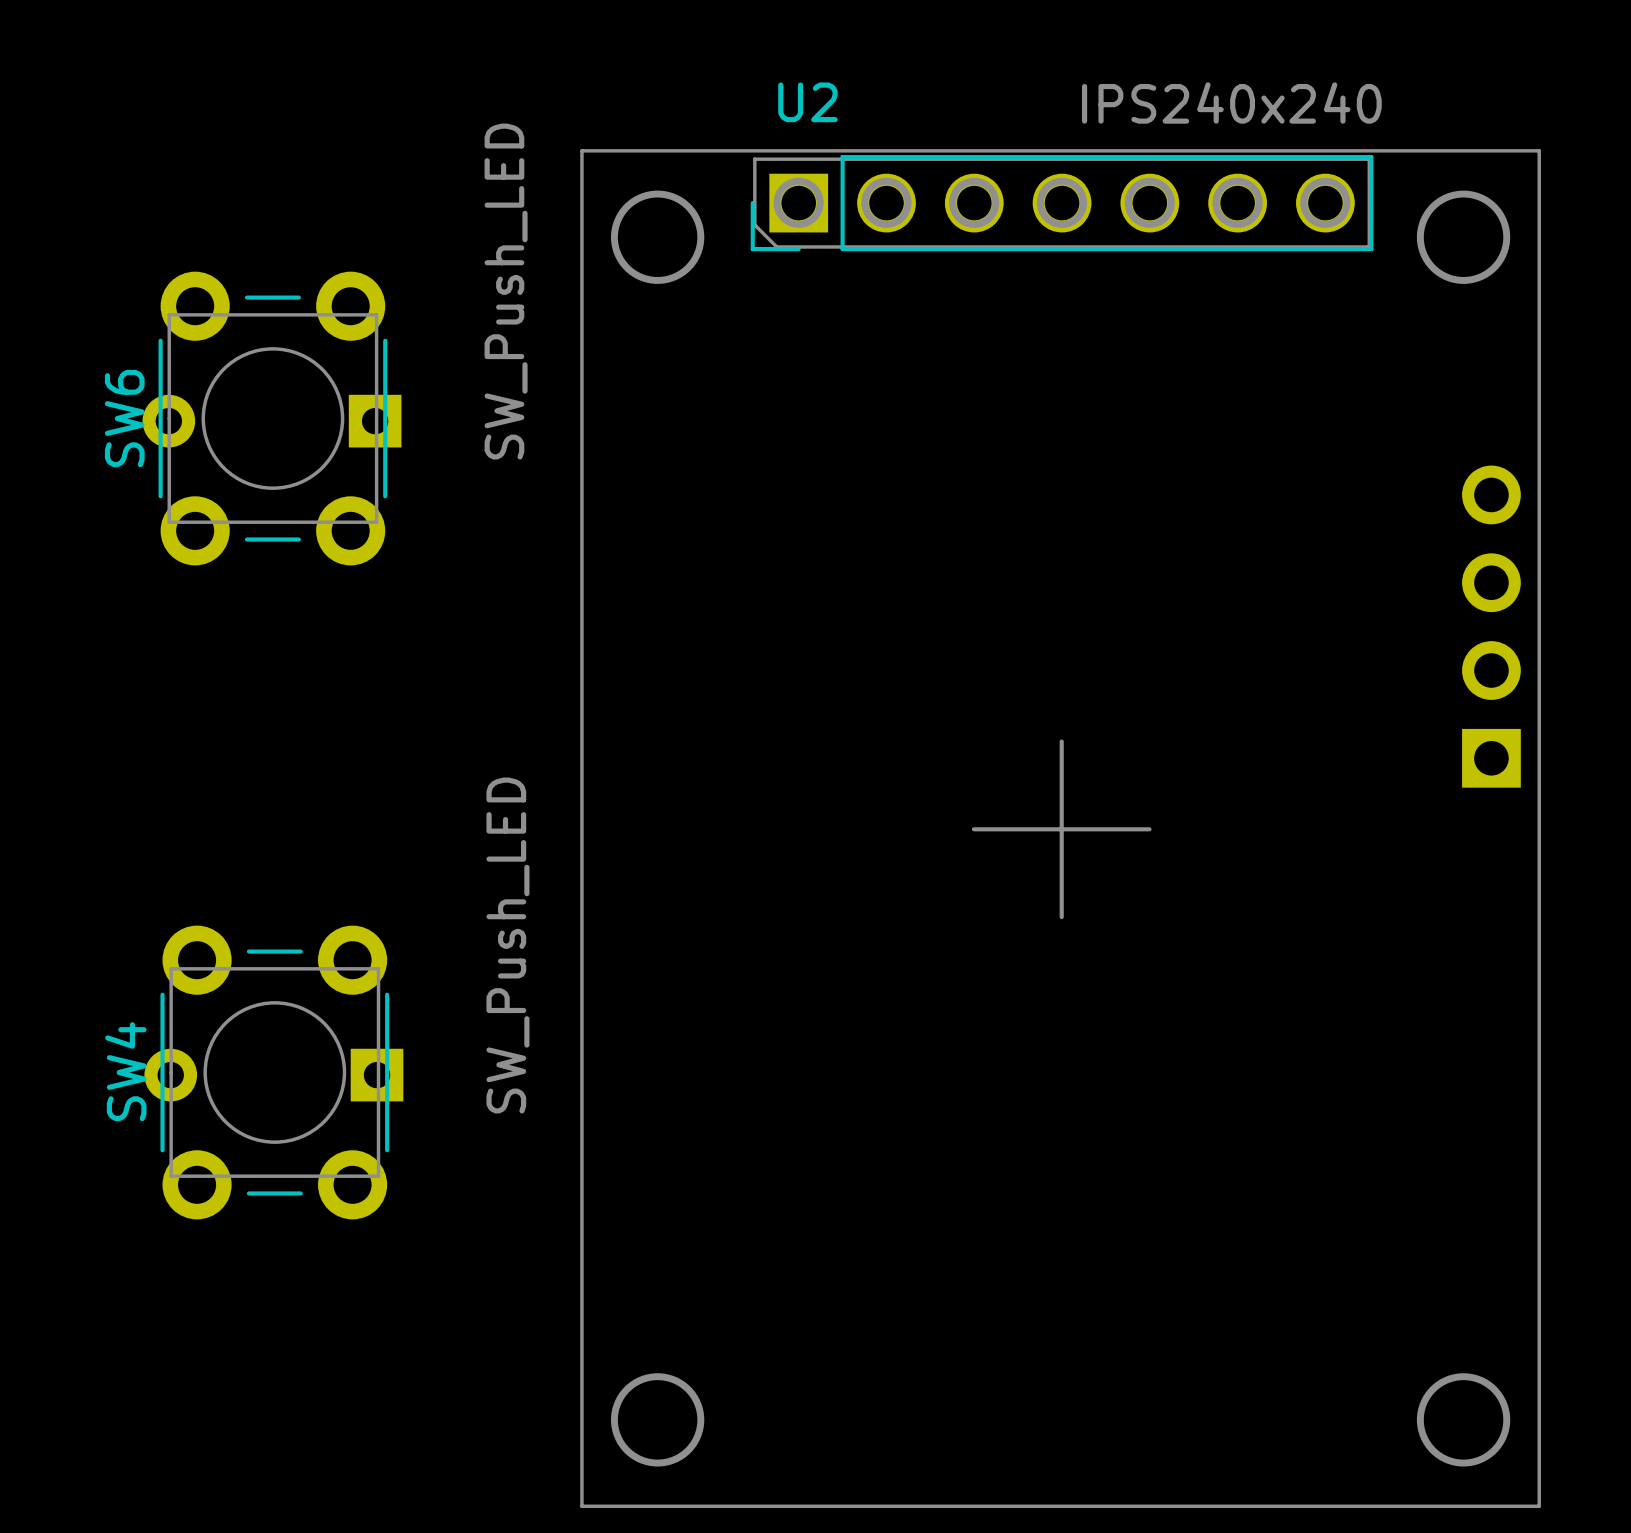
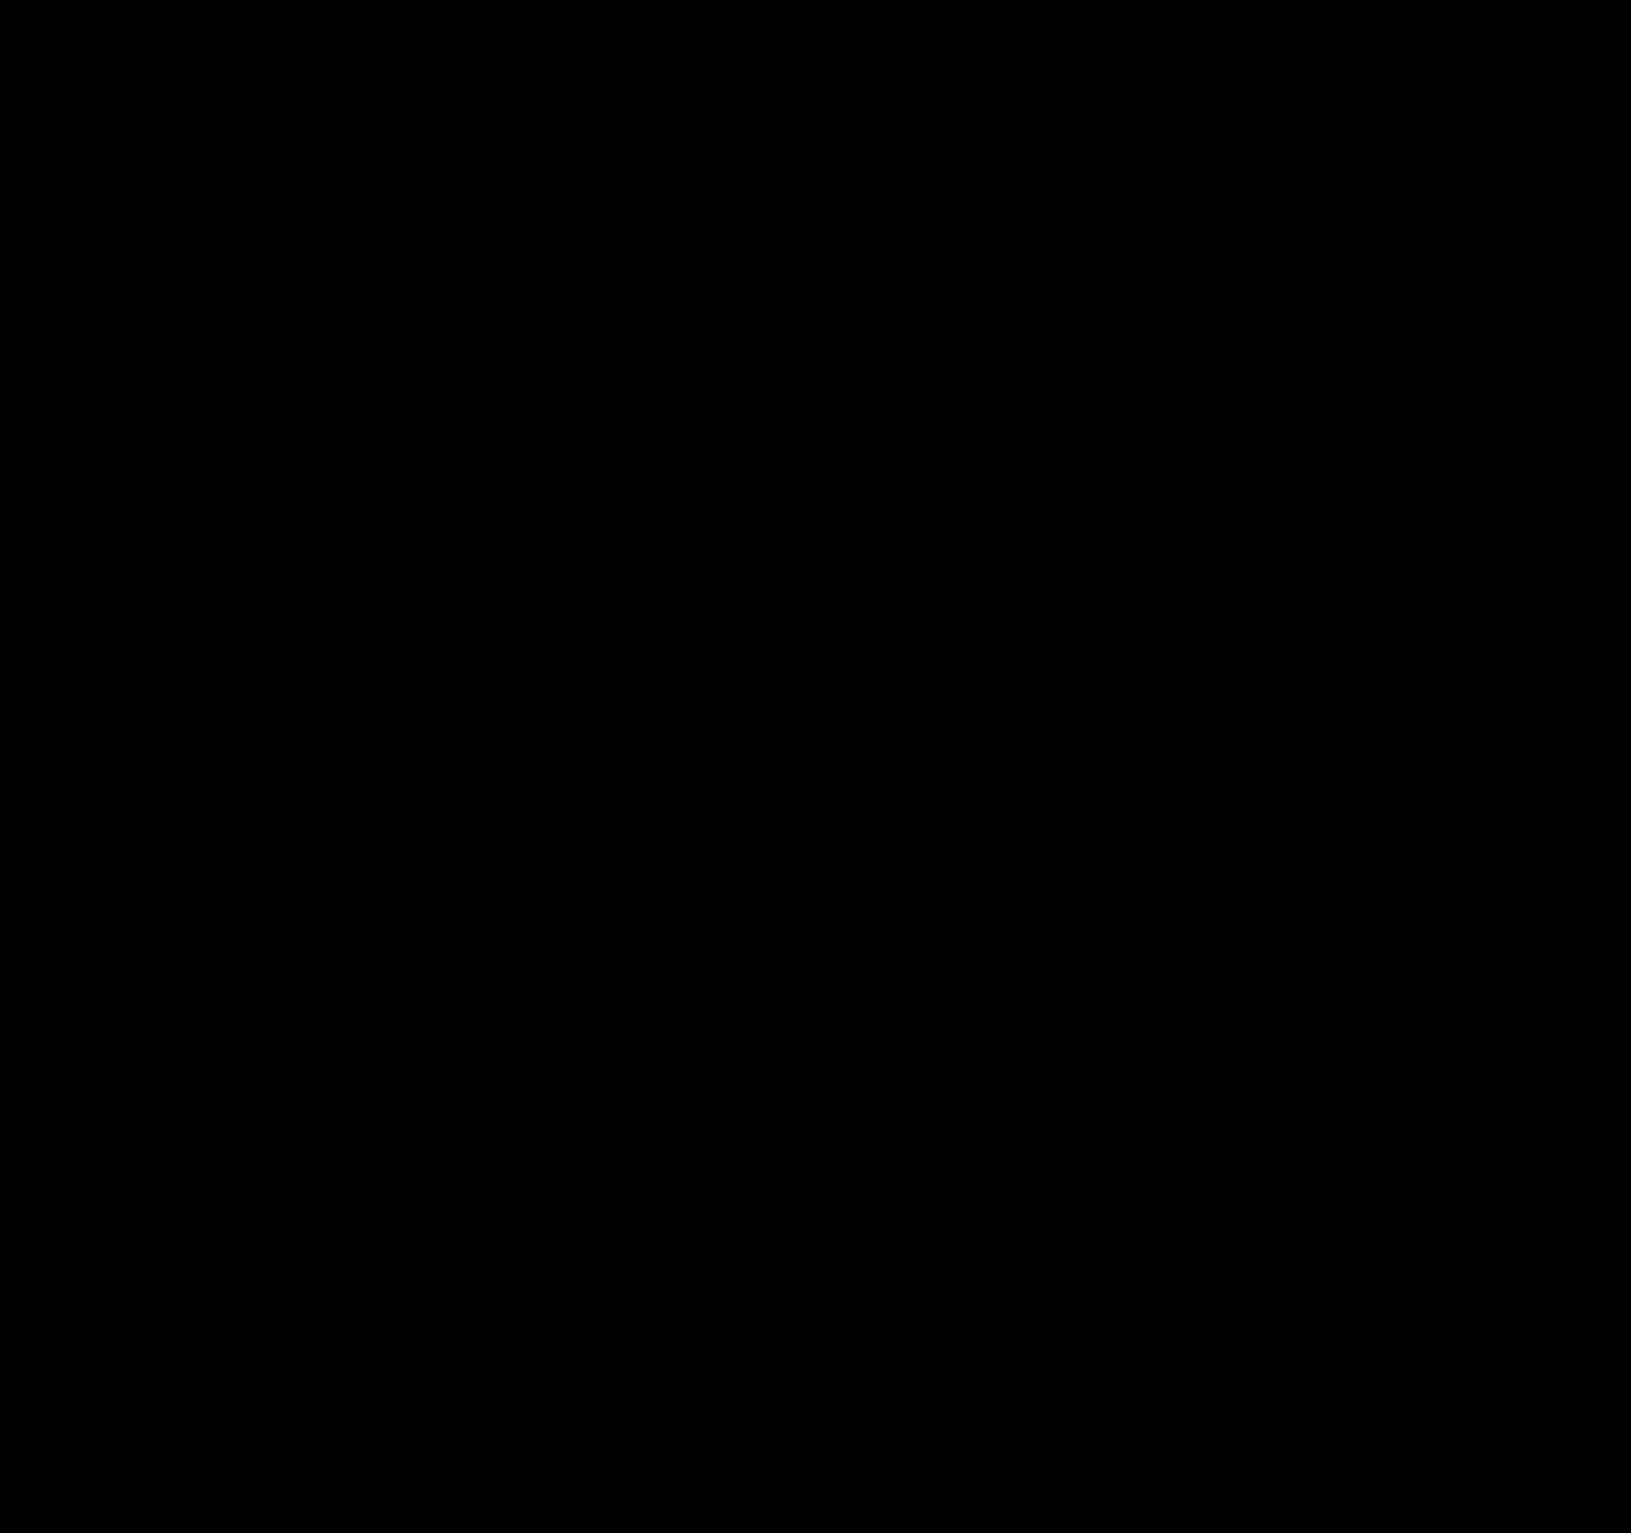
SW6: SW_Push_LED (271, 418) -> none
part: (1491, 626) -> none
U2: IPS240x240 (1060, 828) -> none
SW4: SW_Push_LED (273, 1072) -> none

